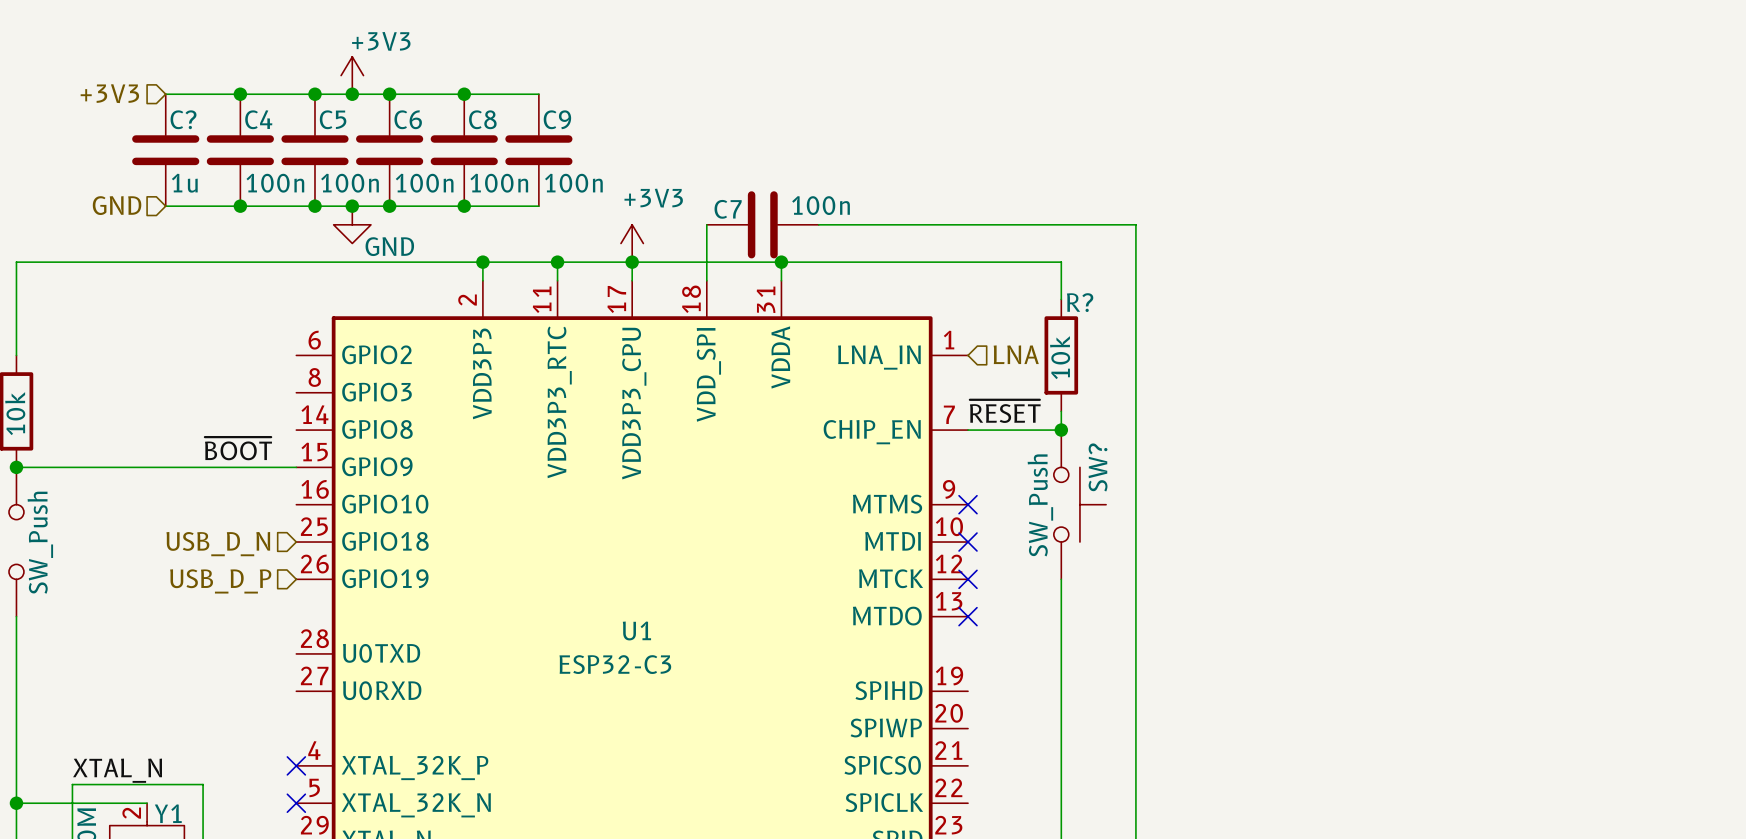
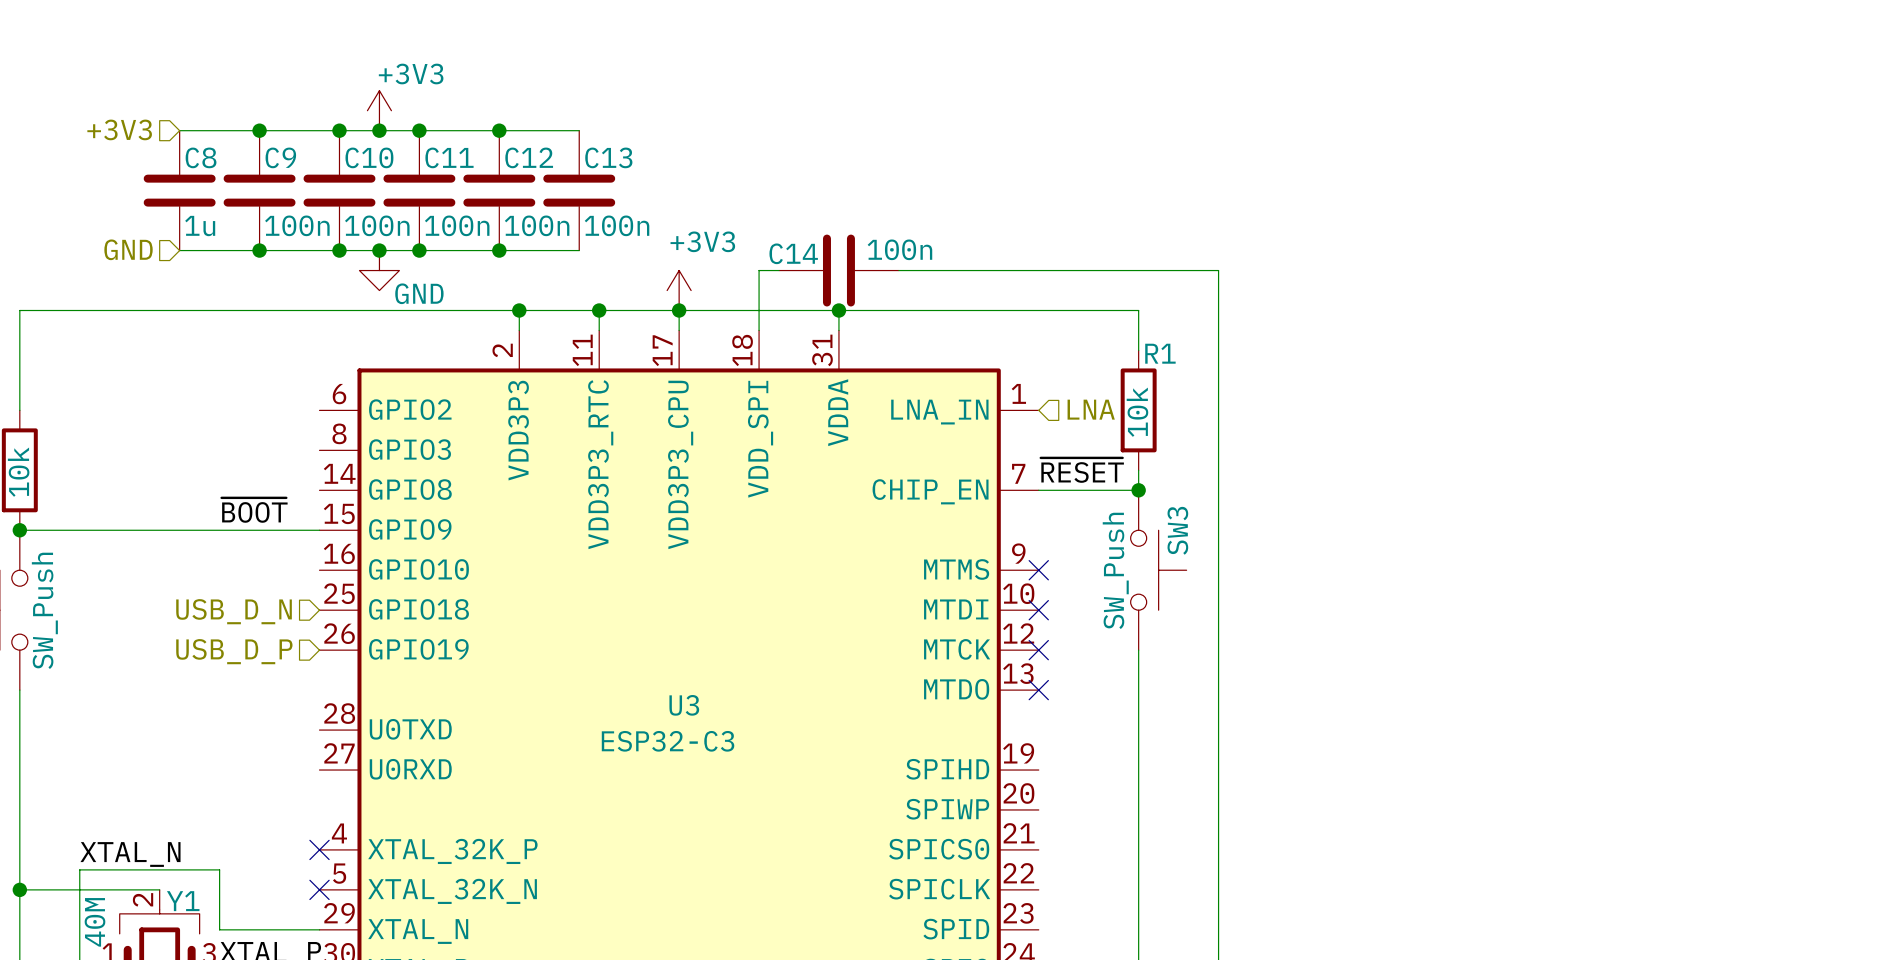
C? name: C? (183, 119) -> C8 (201, 157)
C4 name: C4 (258, 119) -> C9 (280, 157)
C5 name: C5 (333, 119) -> C10 (369, 157)
C6 name: C6 (408, 119) -> C11 (449, 157)
C8 name: C8 (482, 119) -> C12 (529, 157)
C9 name: C9 (557, 119) -> C13 (608, 157)
C7: 100n (762, 224) -> none
C14: none -> 100n (838, 270)
R? name: R? (1080, 302) -> R1 (1160, 353)
SW? name: SW? (1098, 467) -> SW3 (1177, 530)
U1 name: U1 (636, 630) -> U3 (684, 705)

